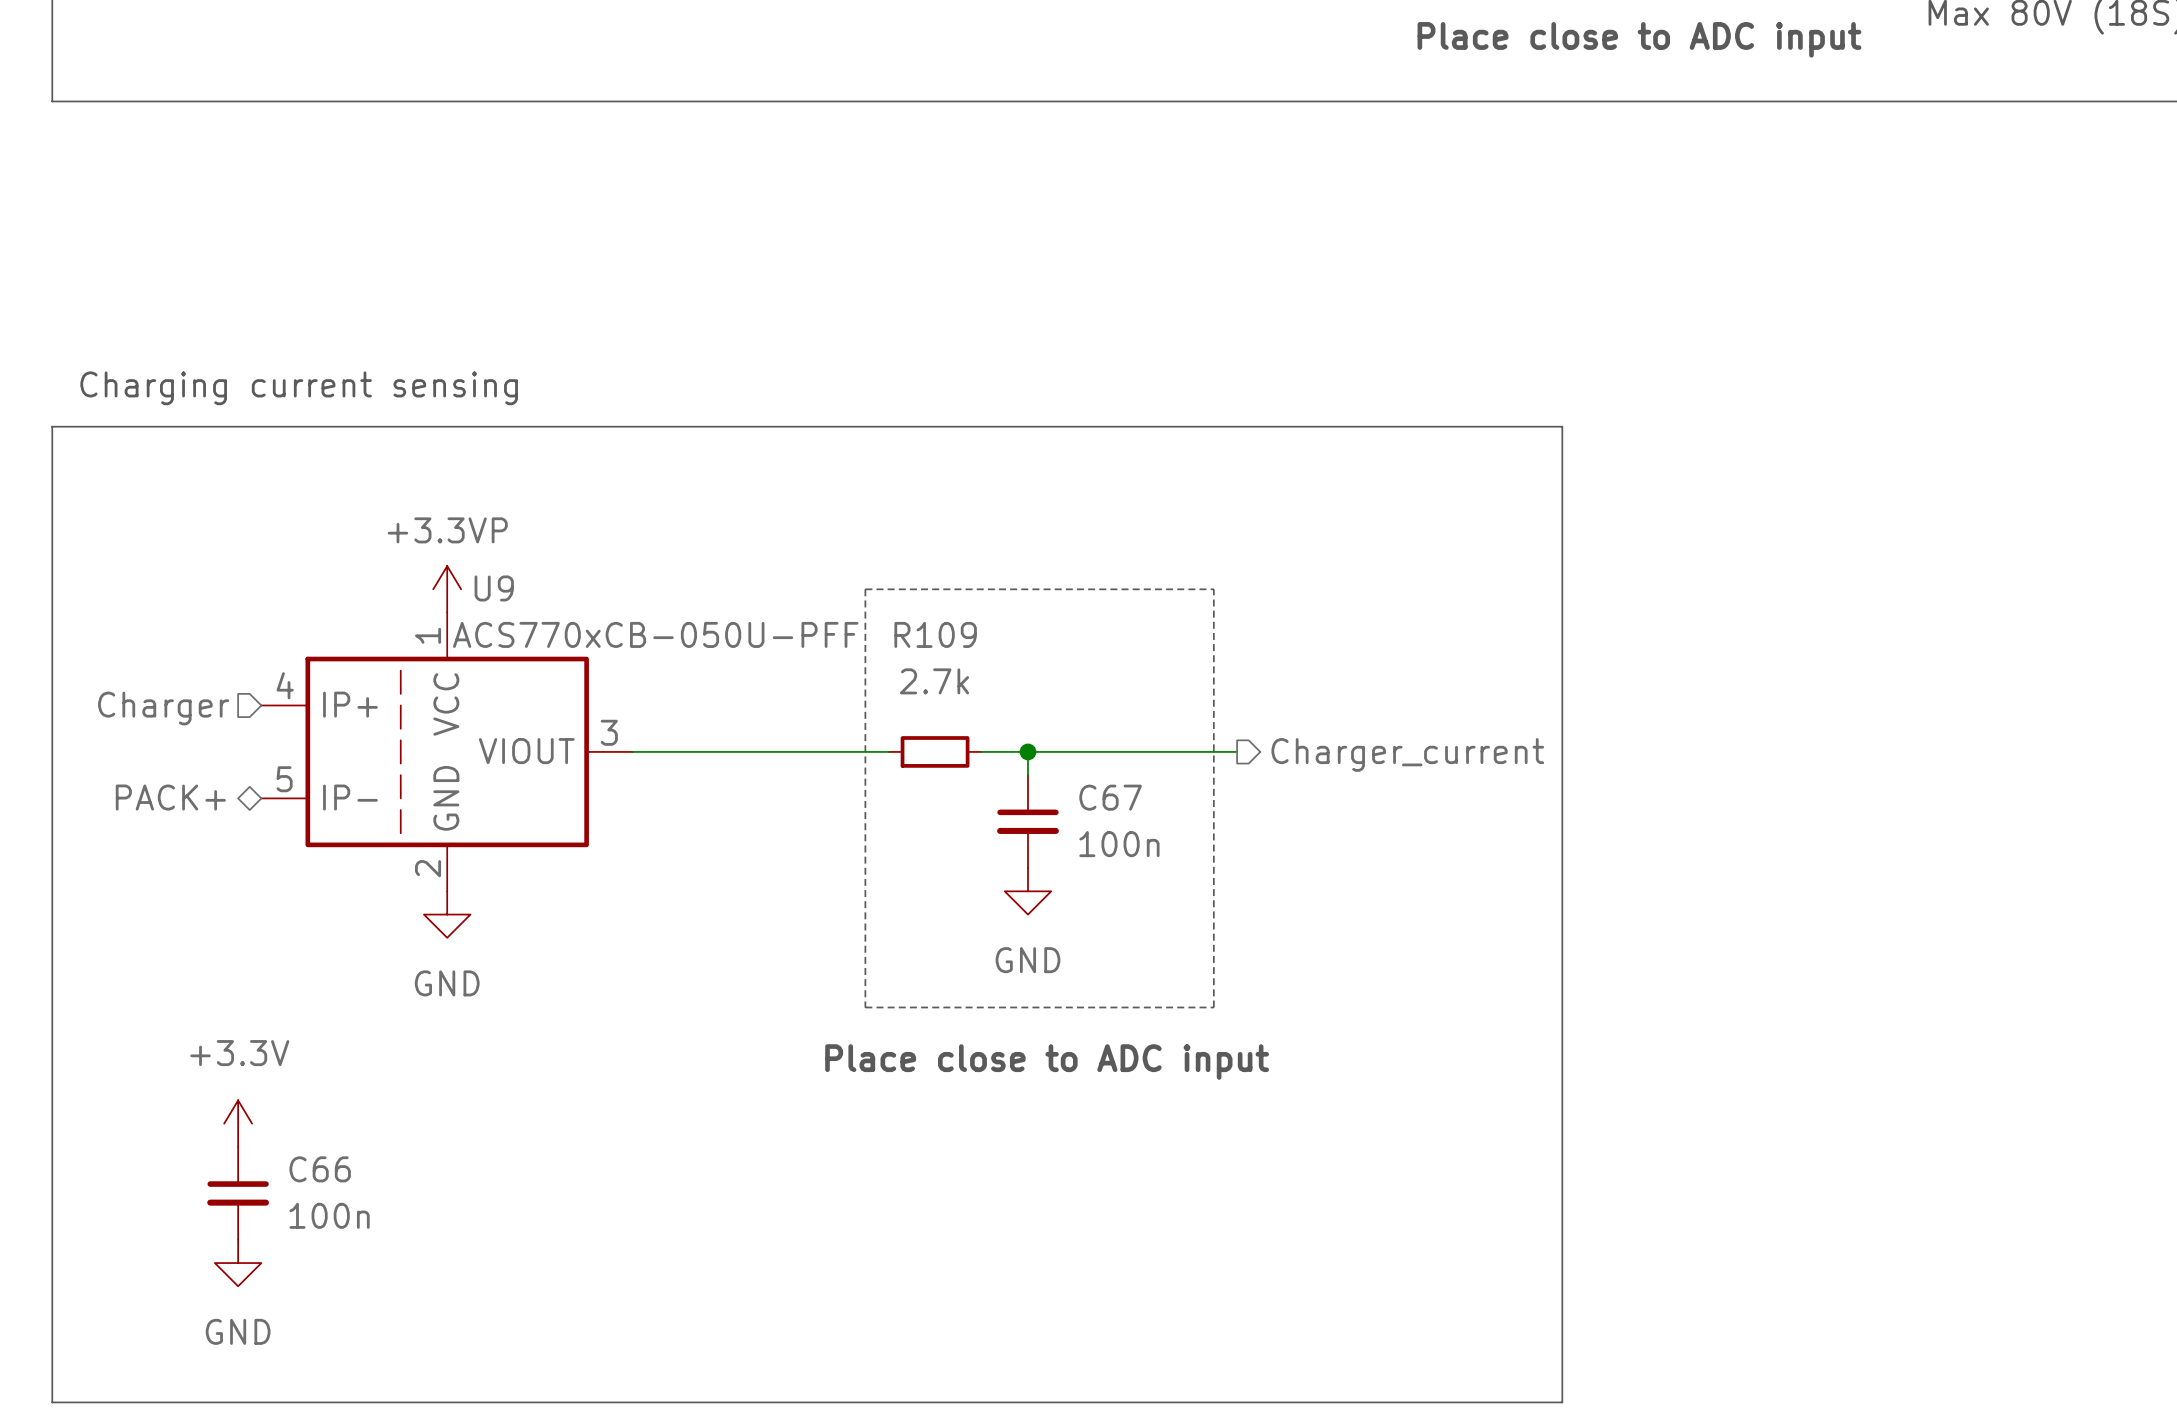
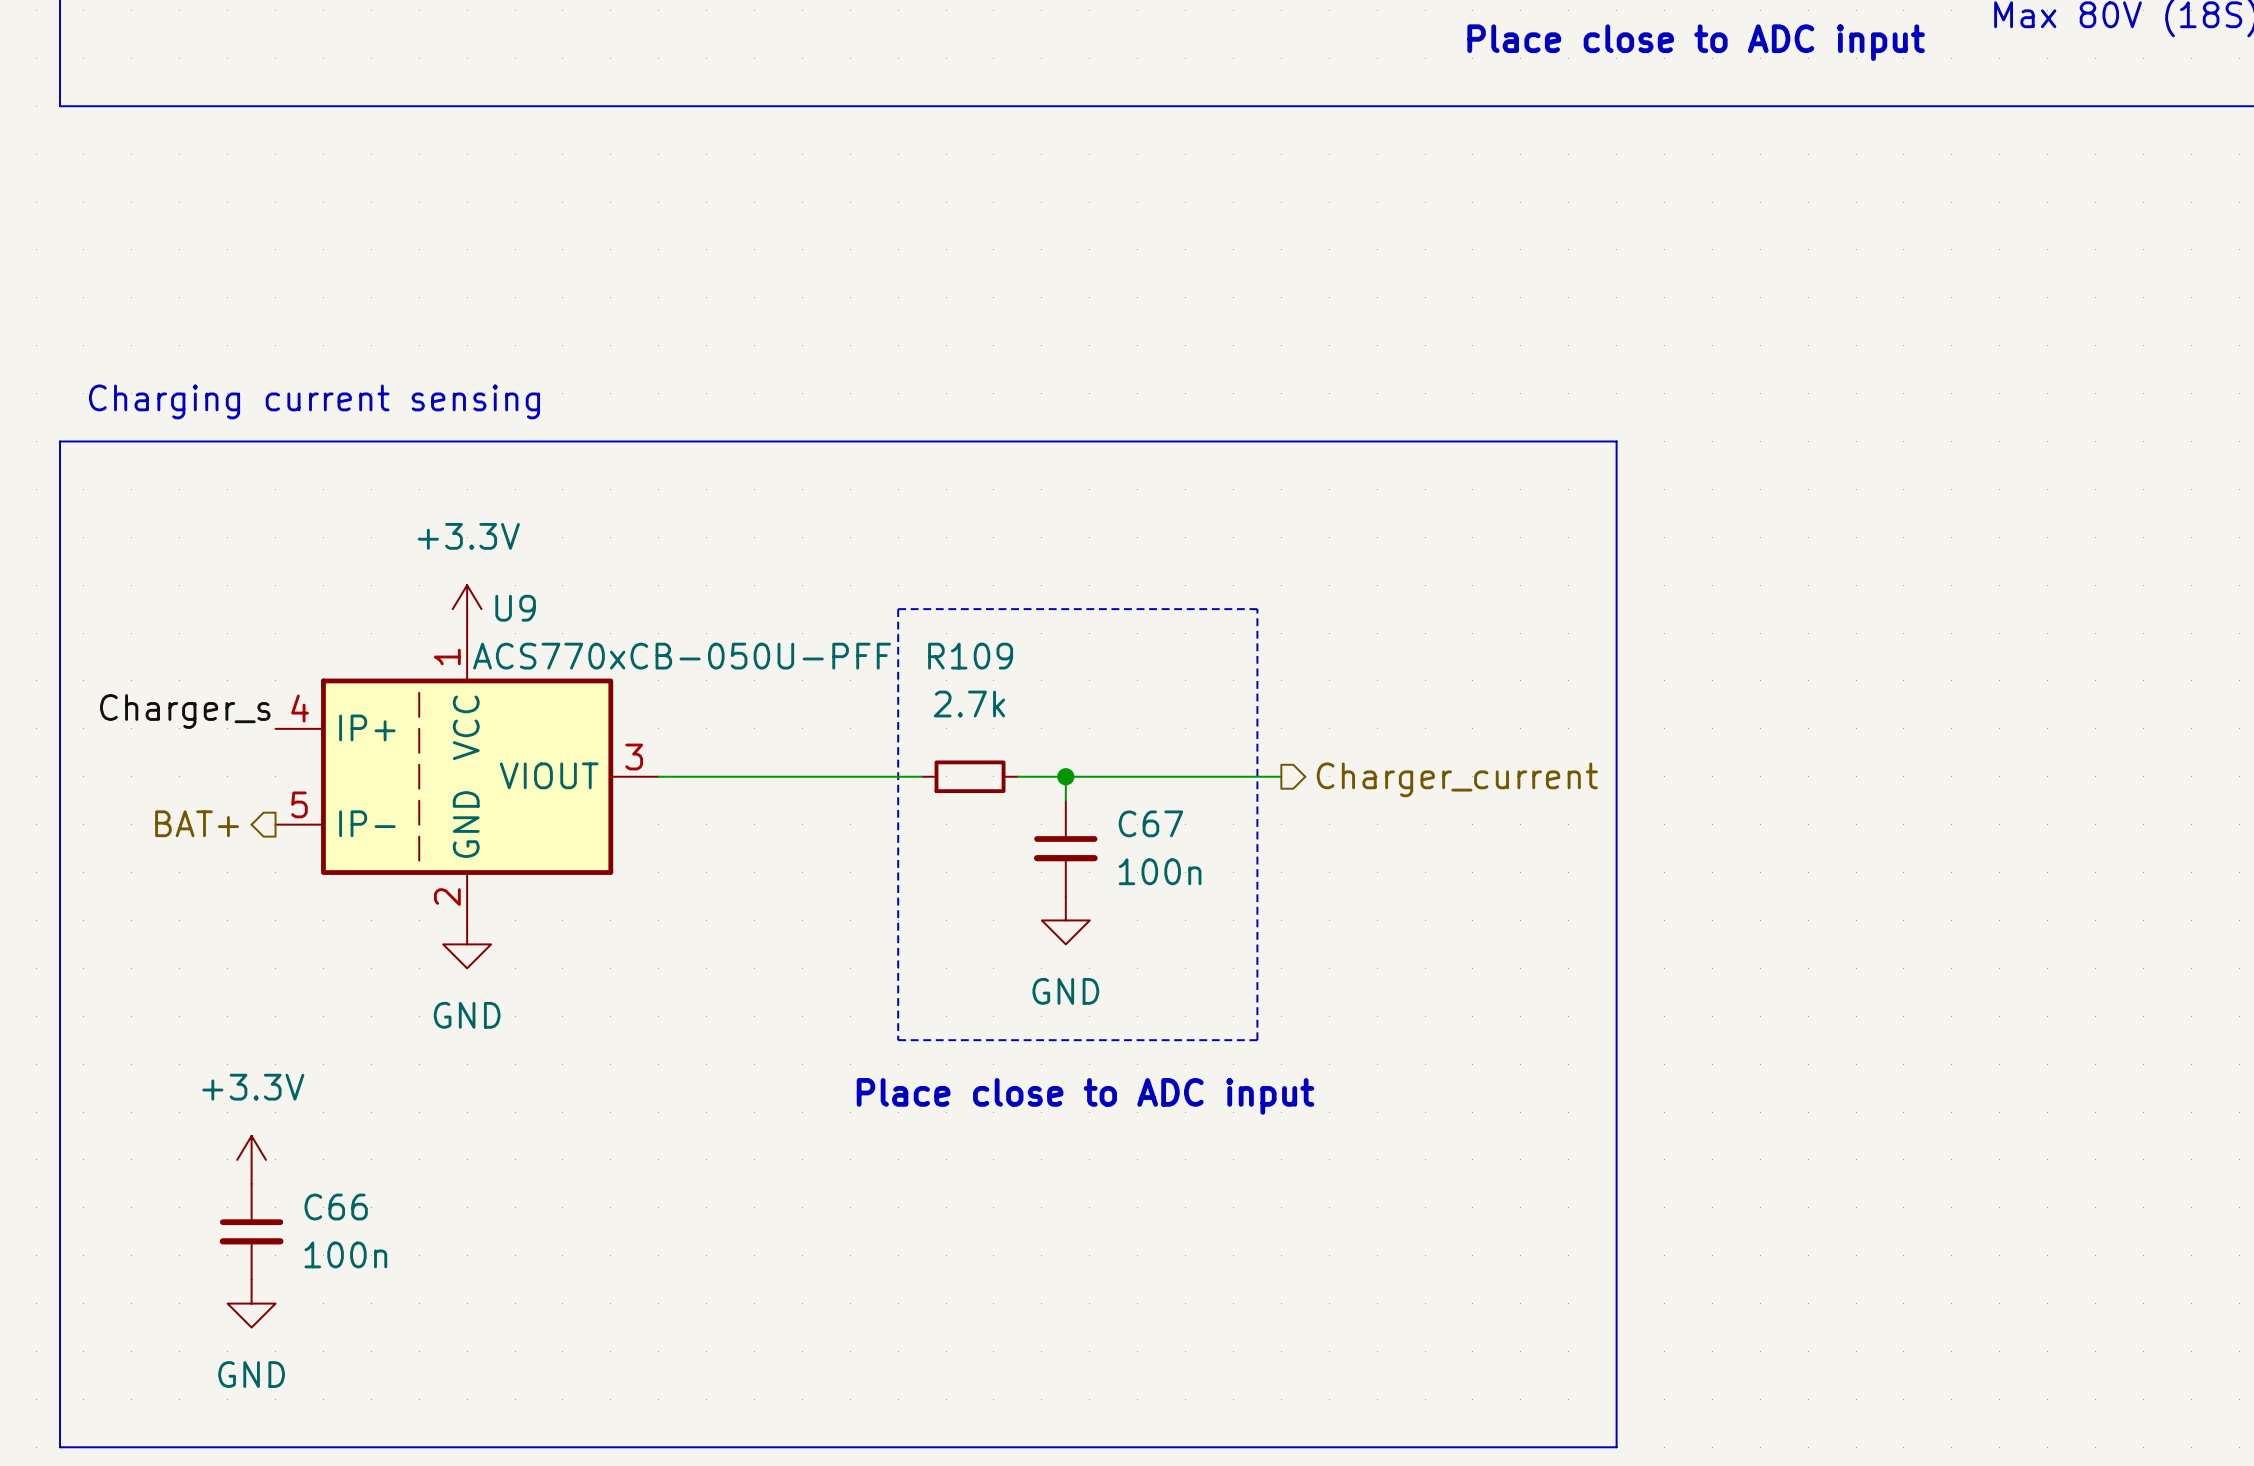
power symbol: +3.3VP (447, 589) -> +3.3V (467, 609)
label: none -> Charger_s (185, 711)
hierarchical label: Charger (163, 708) -> none
hierarchical label shape: bidirectional (170, 797) -> output (197, 823)
hierarchical label: PACK+ (170, 797) -> BAT+ (197, 823)

